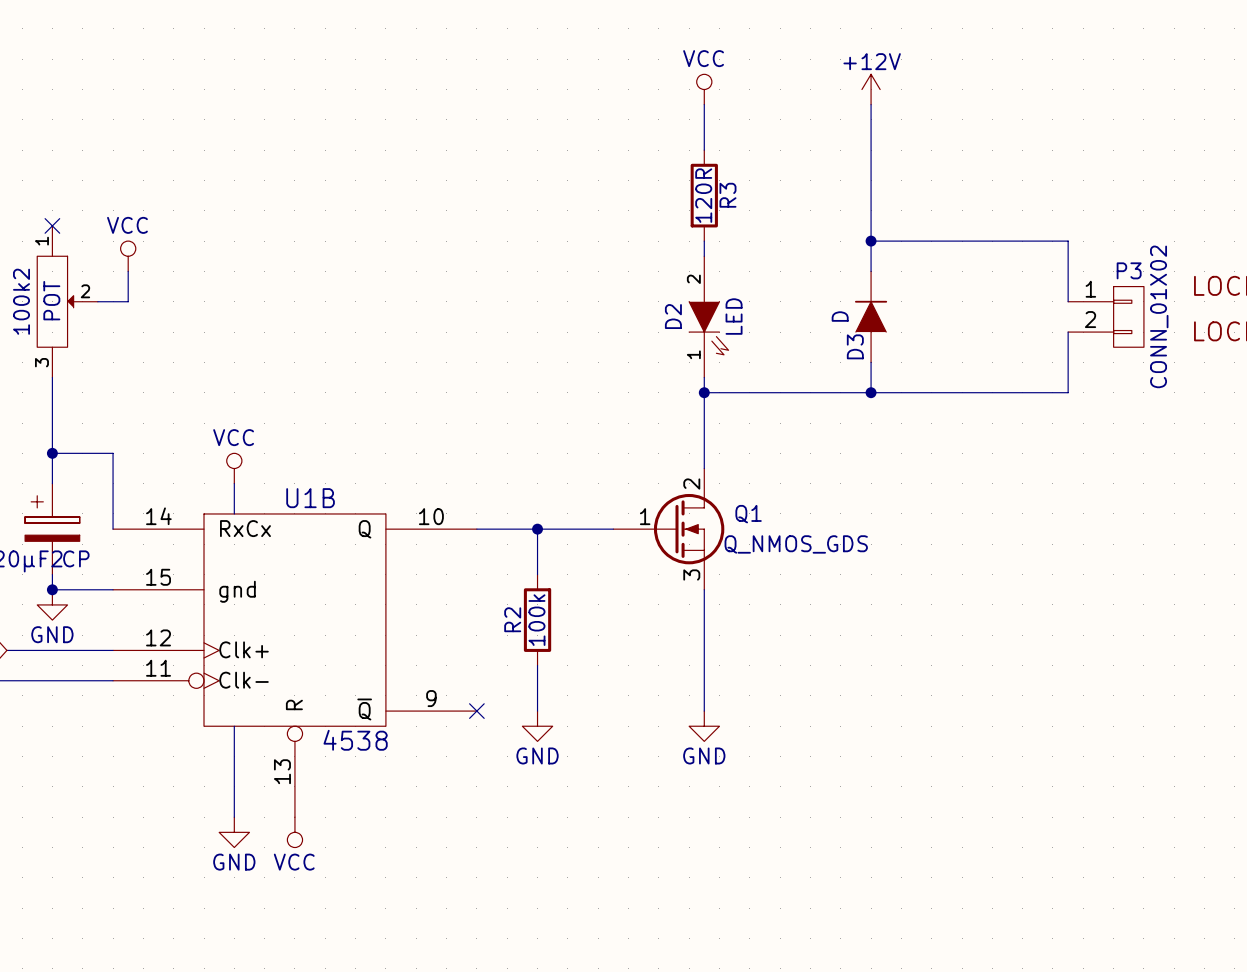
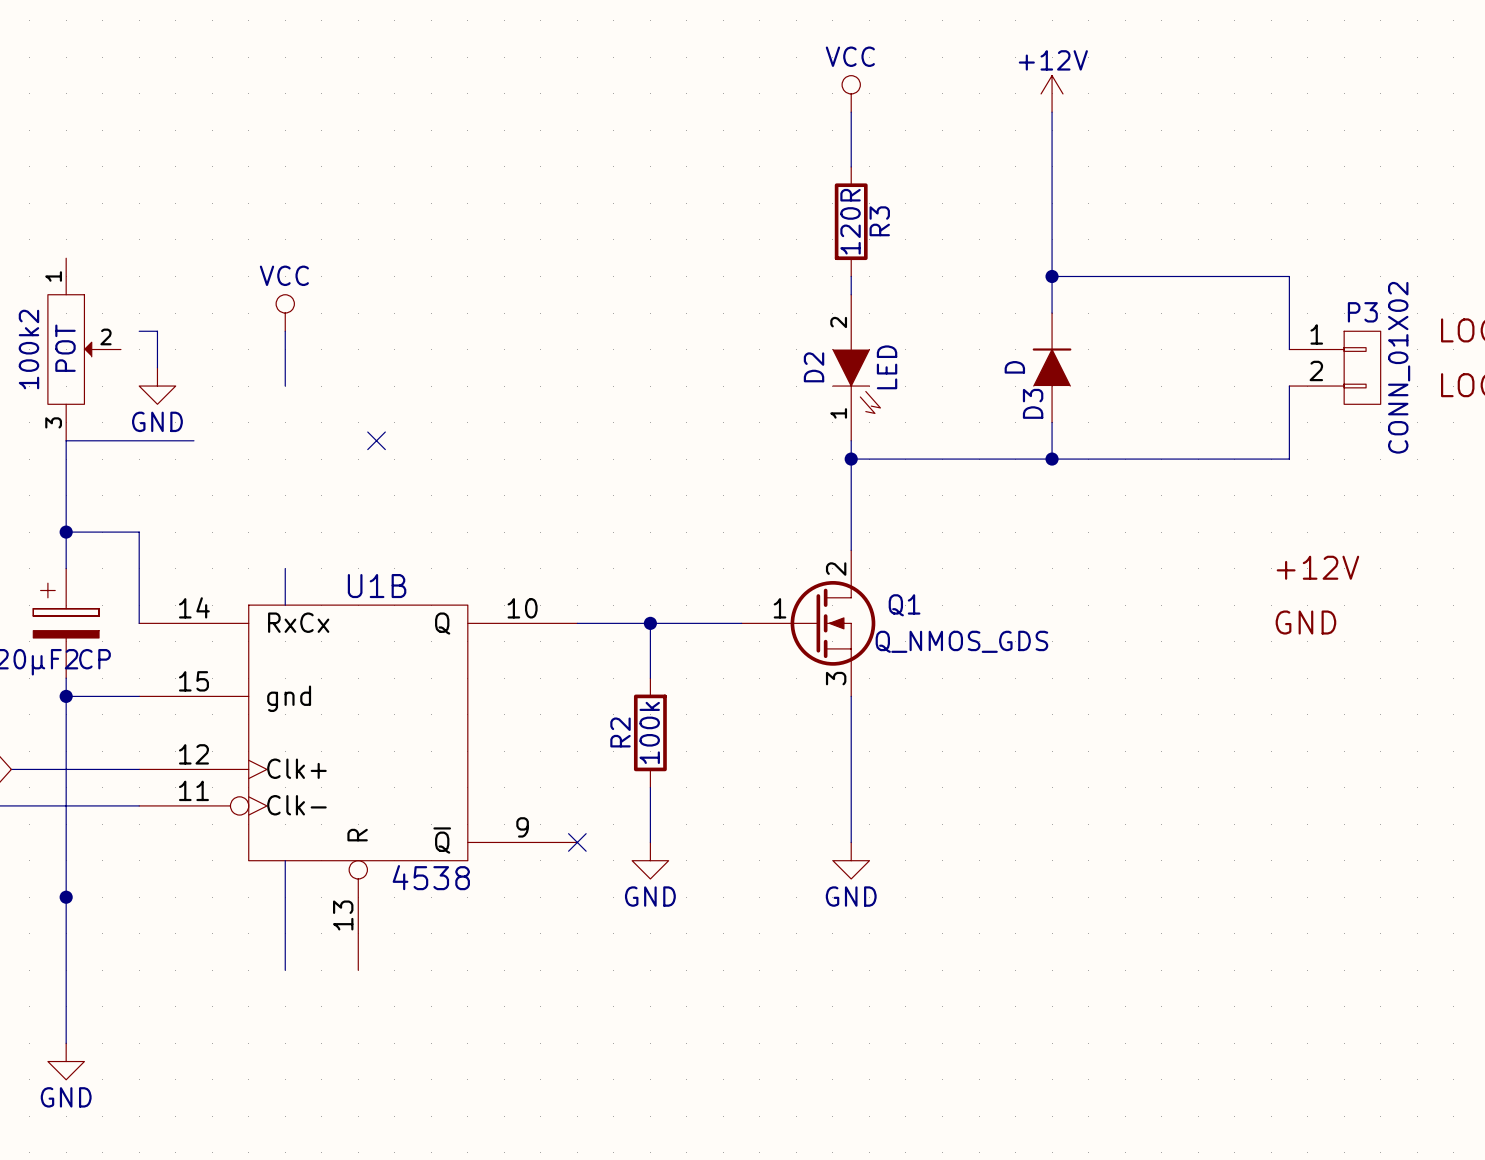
no-connect mark: (52, 225) -> none
power symbol: VCC (128, 256) -> none
wire: (128, 271) (128, 286) -> (139, 331) (157, 331)
power symbol: none -> VCC (285, 313)
wire: none -> (285, 331) (285, 386)
wire: (97, 301) (128, 301) -> (157, 367) (157, 349)
power symbol: none -> GND (157, 386)
wire: none -> (66, 440) (193, 440)
no-connect mark: none -> (376, 440)
power symbol: VCC (234, 468) -> none
label: none -> +12V (1317, 567)
label: none -> GND (1305, 622)
wire: none -> (66, 696) (66, 1043)
power symbol: GND (52, 604) -> none
junction: none -> (66, 897)
power symbol: GND (234, 832) -> none
power symbol: VCC (294, 832) -> none
power symbol: none -> GND (66, 1061)

